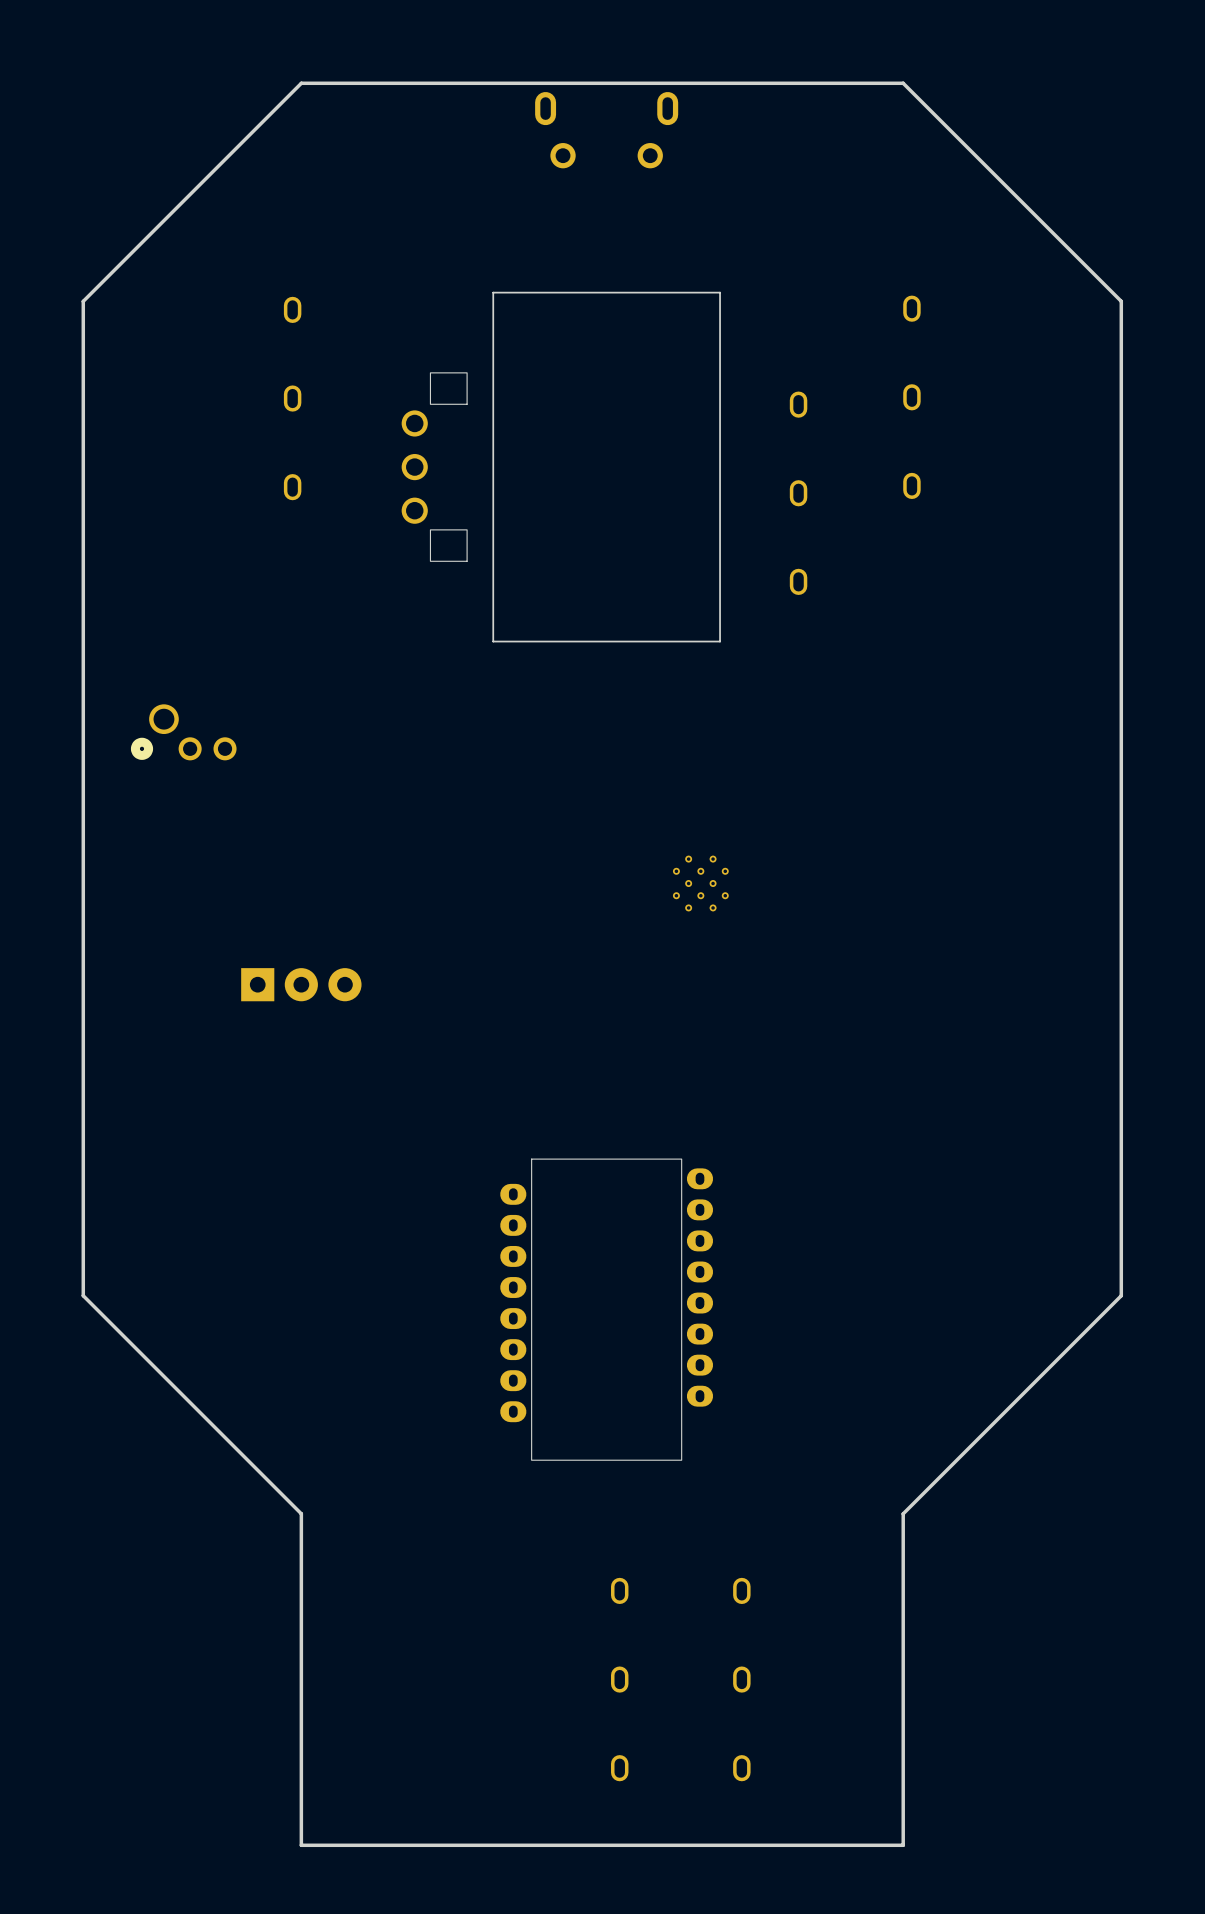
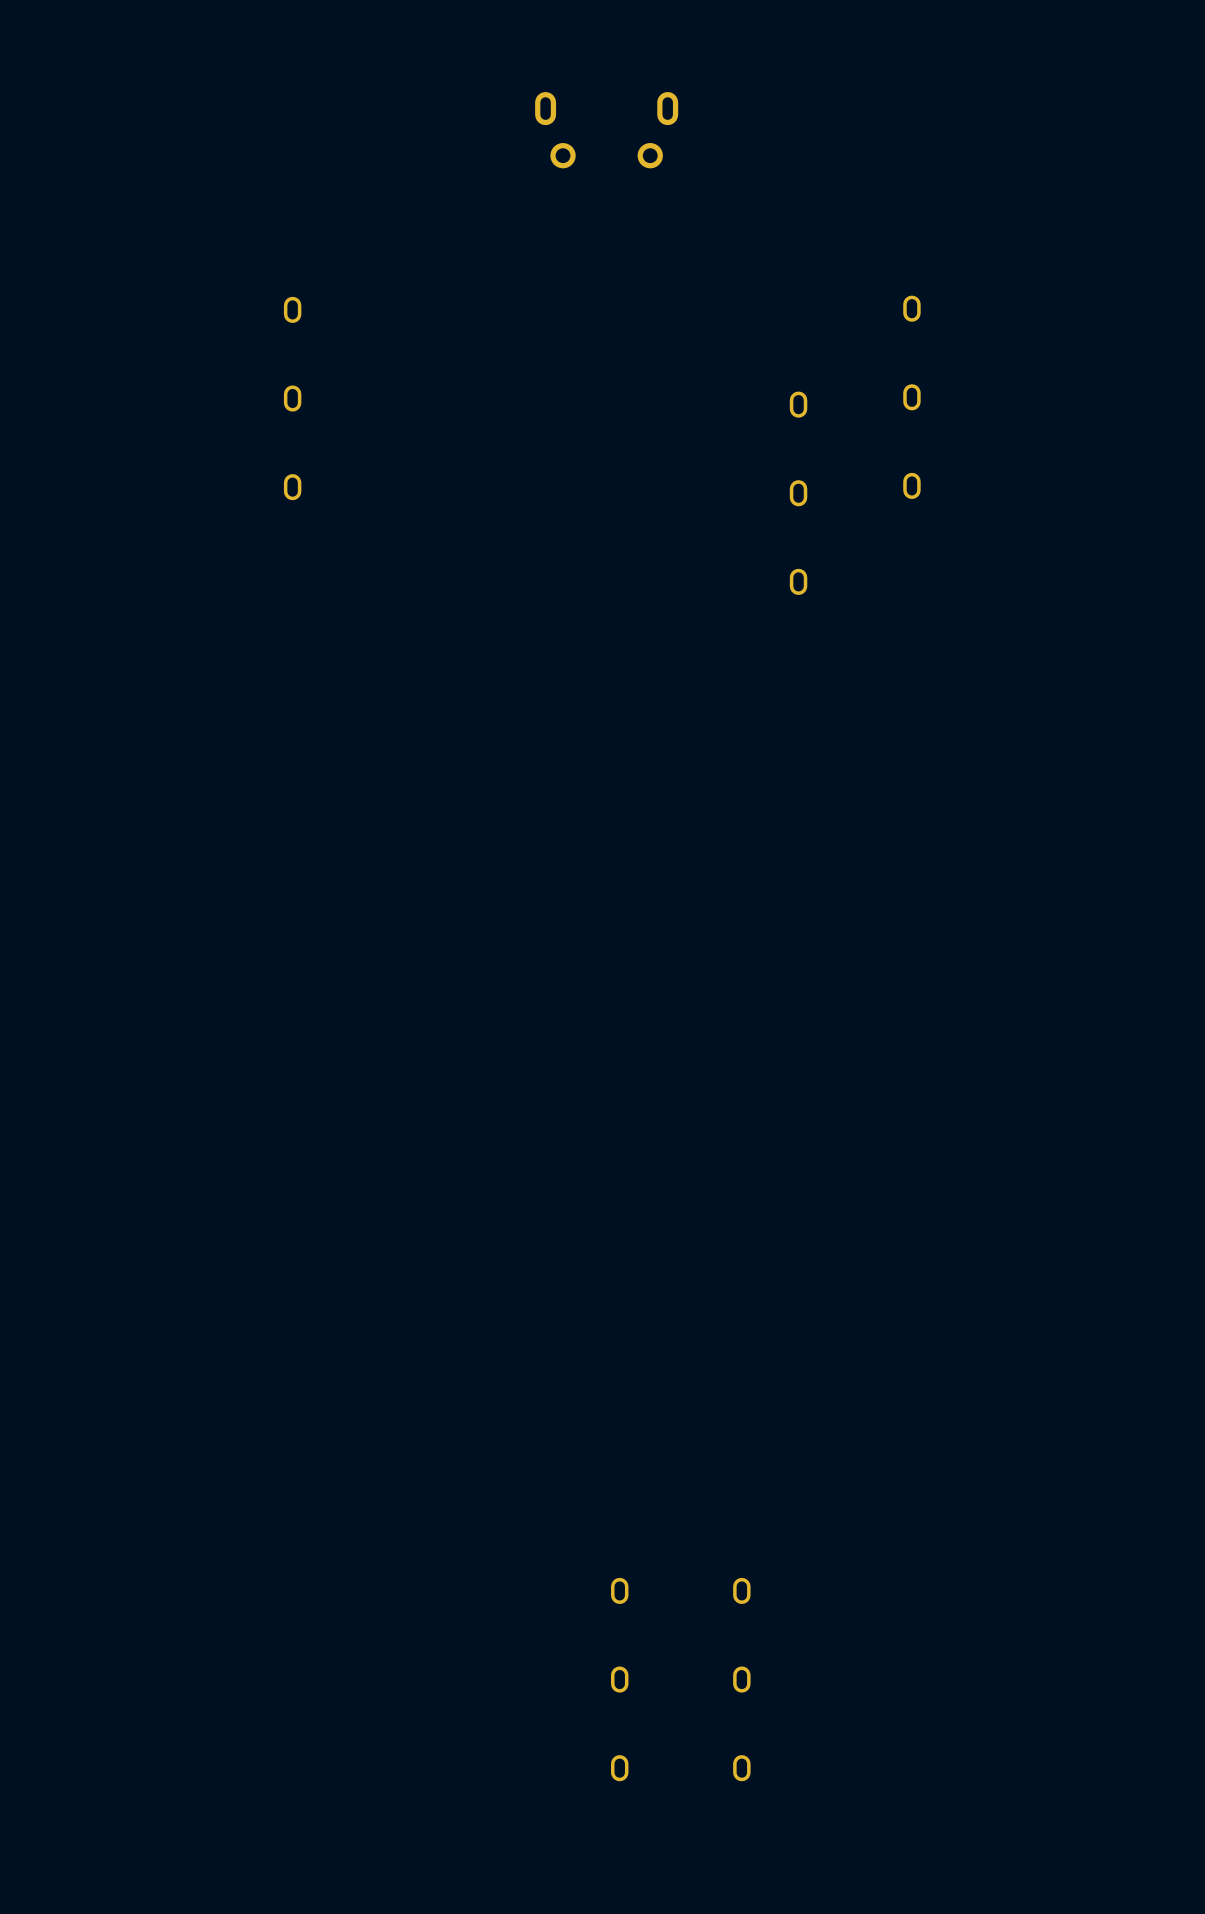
board edge: (903, 83) (301, 83) (83, 301) (83, 1295) (301, 1513) (301, 1845) (903, 1845) (903, 1513) (1121, 1295) (1121, 301) (903, 83) -> none
board edge: (720, 292) (493, 292) (493, 641) (720, 641) (720, 292) -> none
part: (434, 467) -> none
part: (183, 732) -> none
part: (700, 883) -> none
part: (301, 984) -> none
part: (606, 1309) -> none

